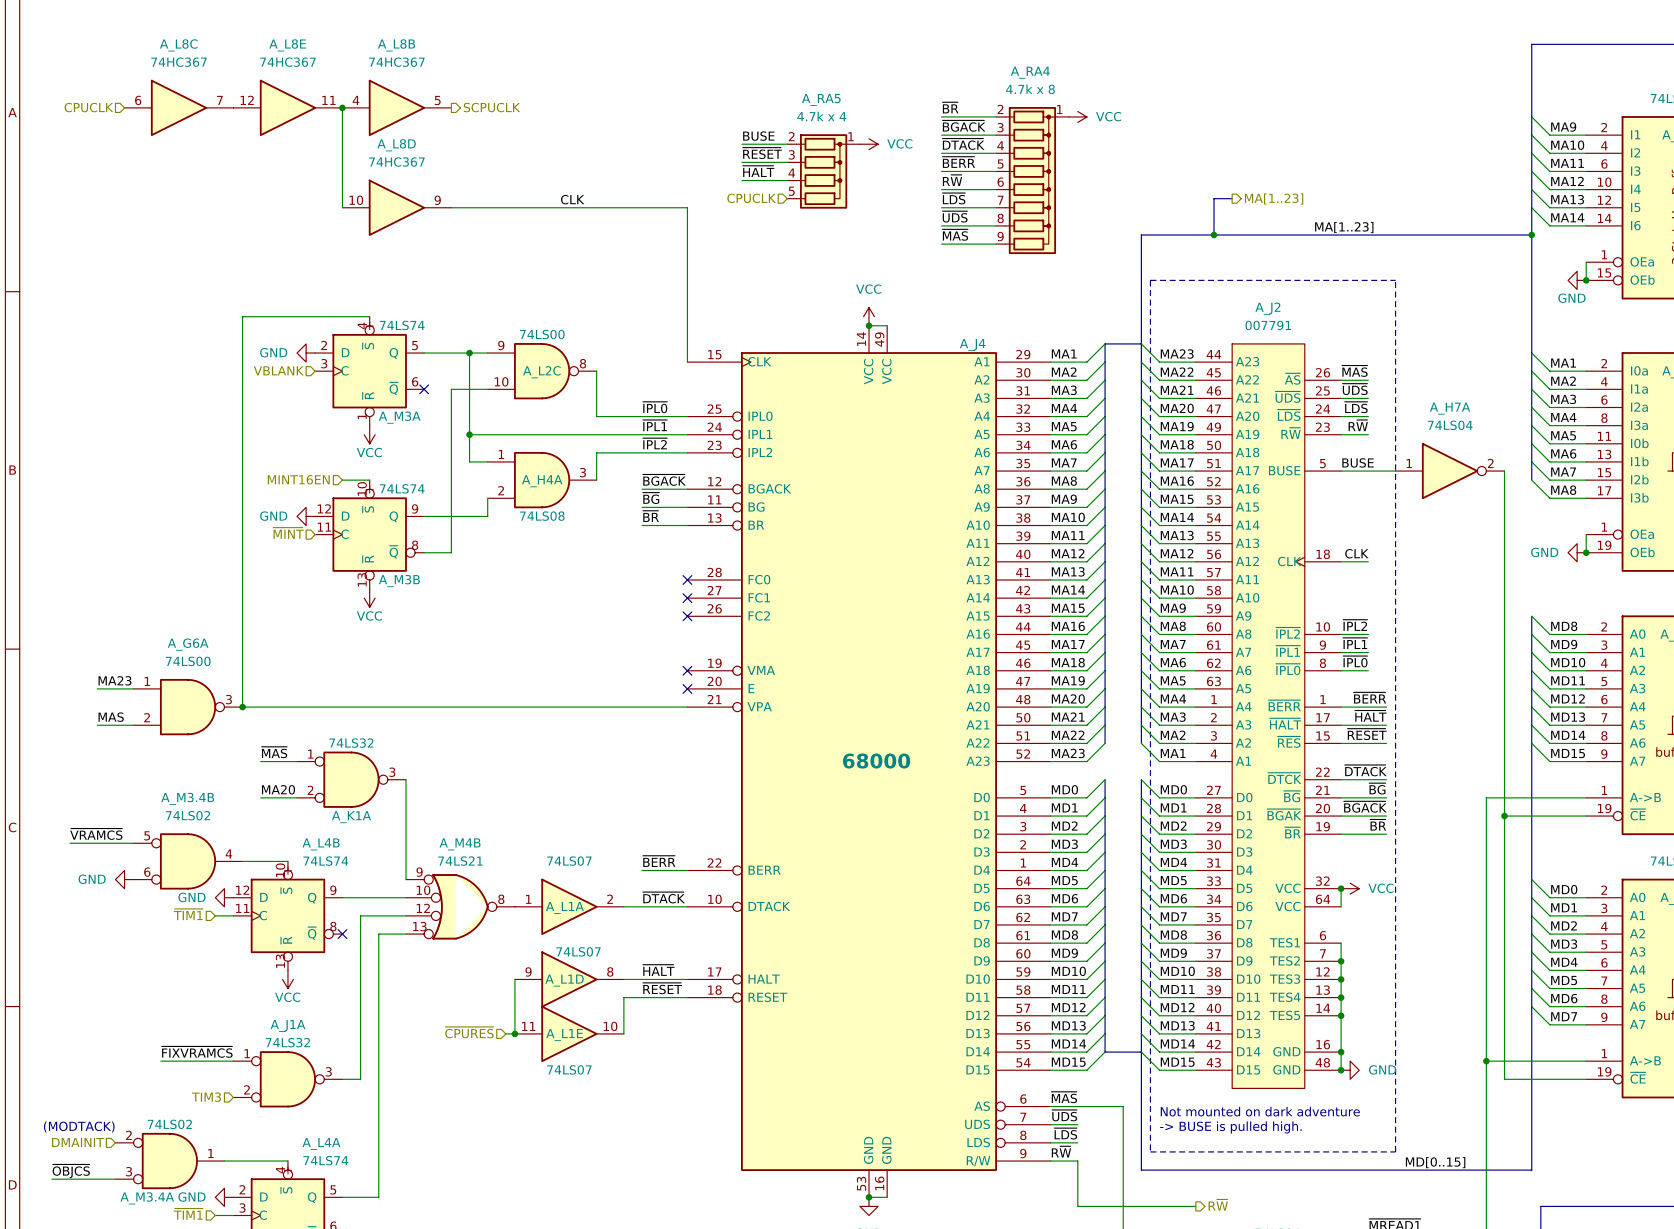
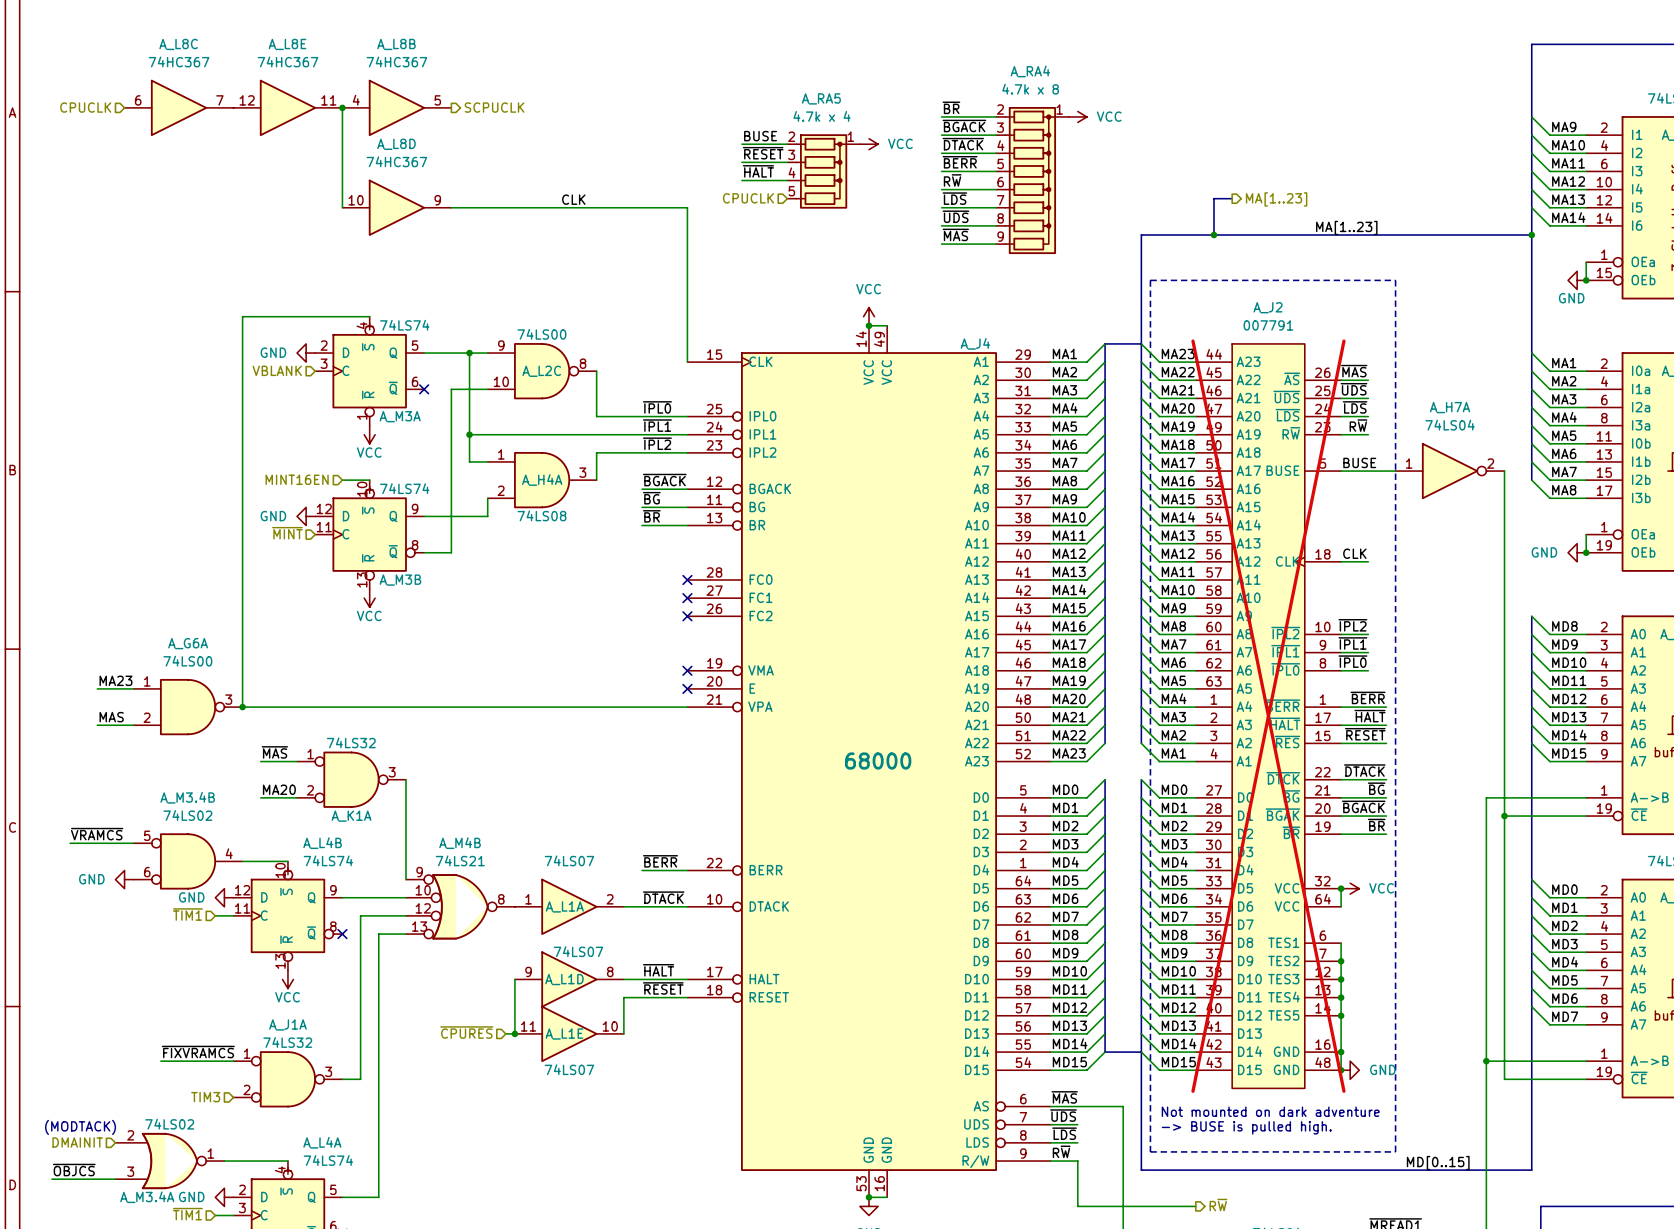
A_J2 do-not-place cross: none -> (1268, 716)
A_M3.4A symbol: [115, 1132, 225, 1190] -> [115, 1132, 225, 1190]

